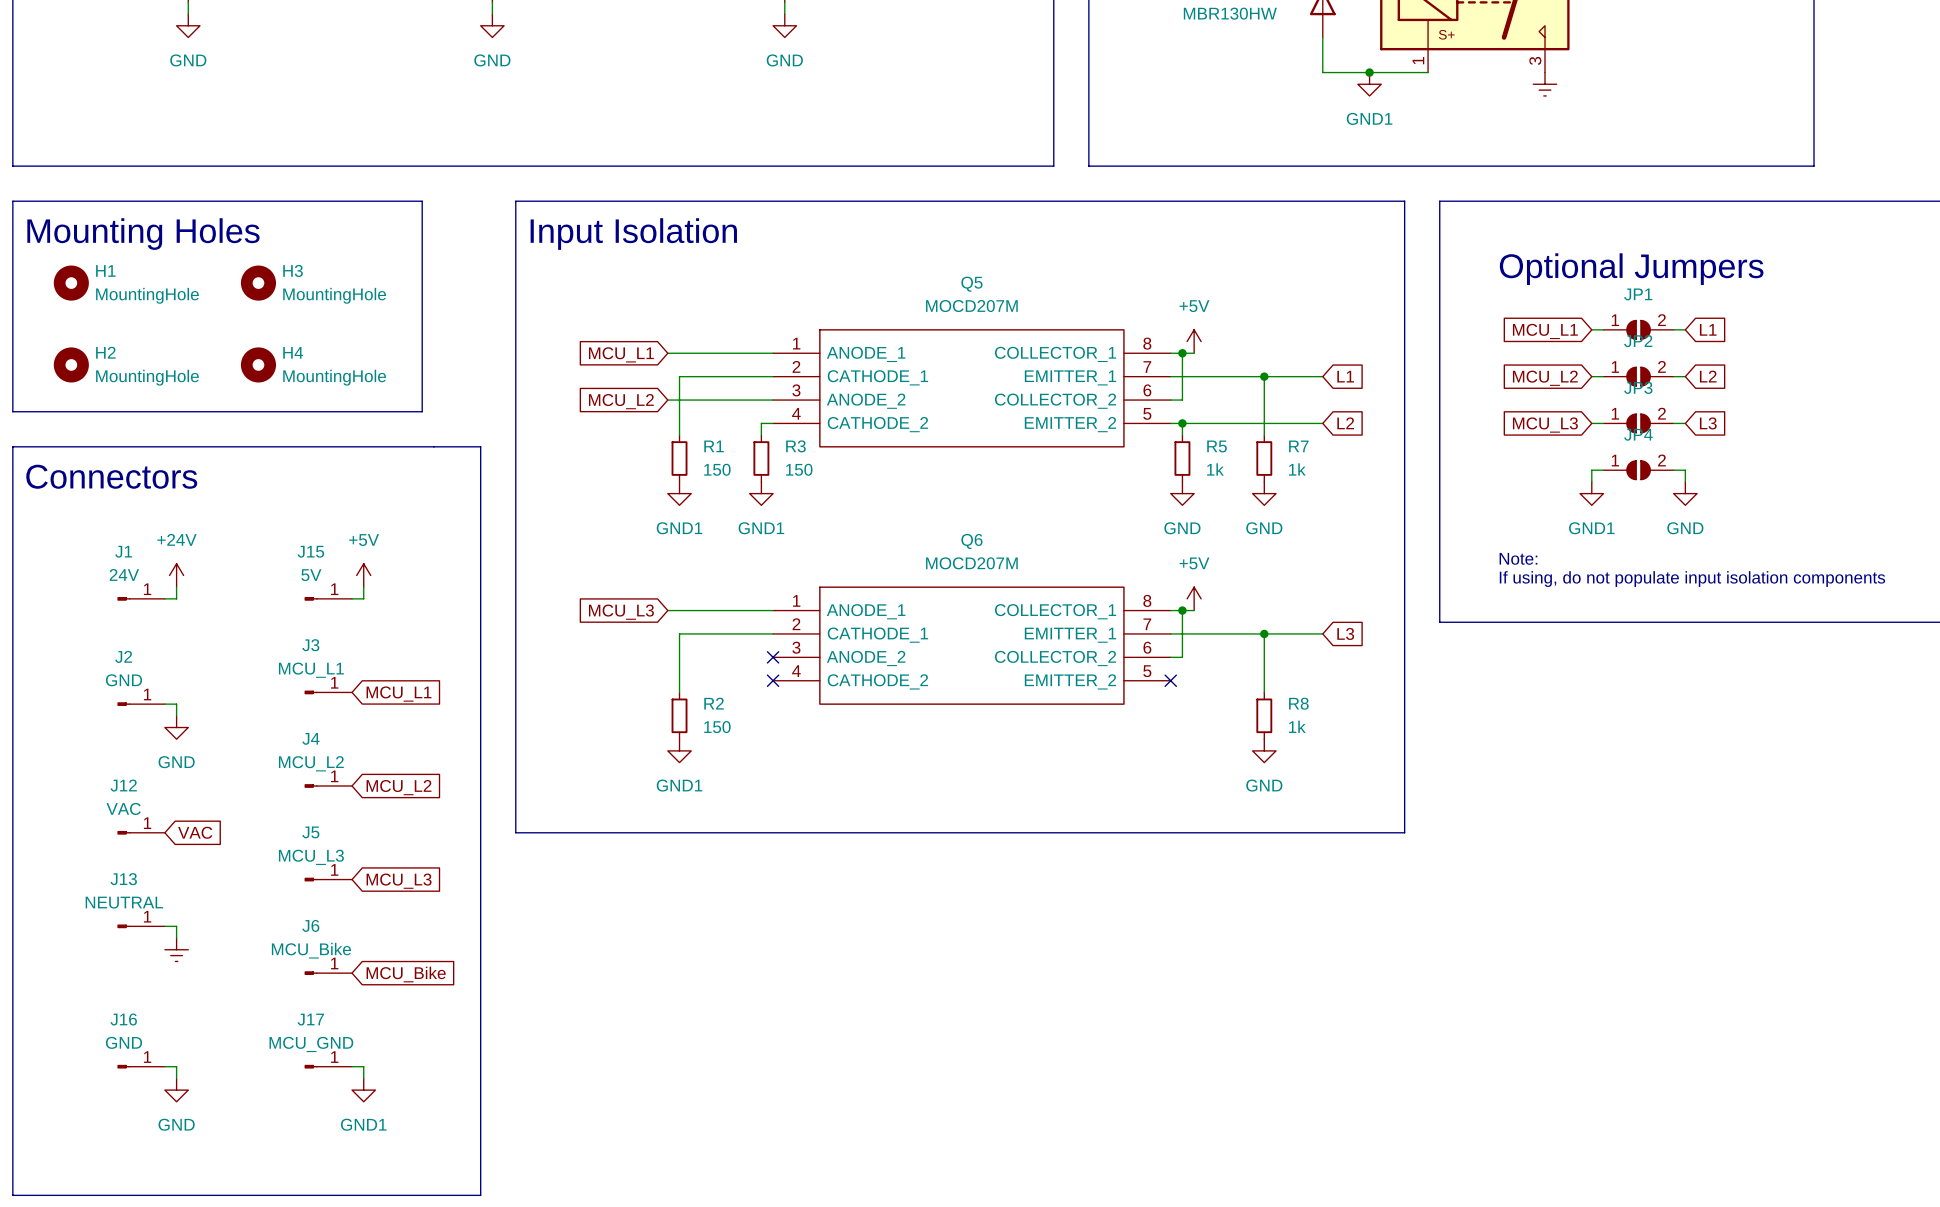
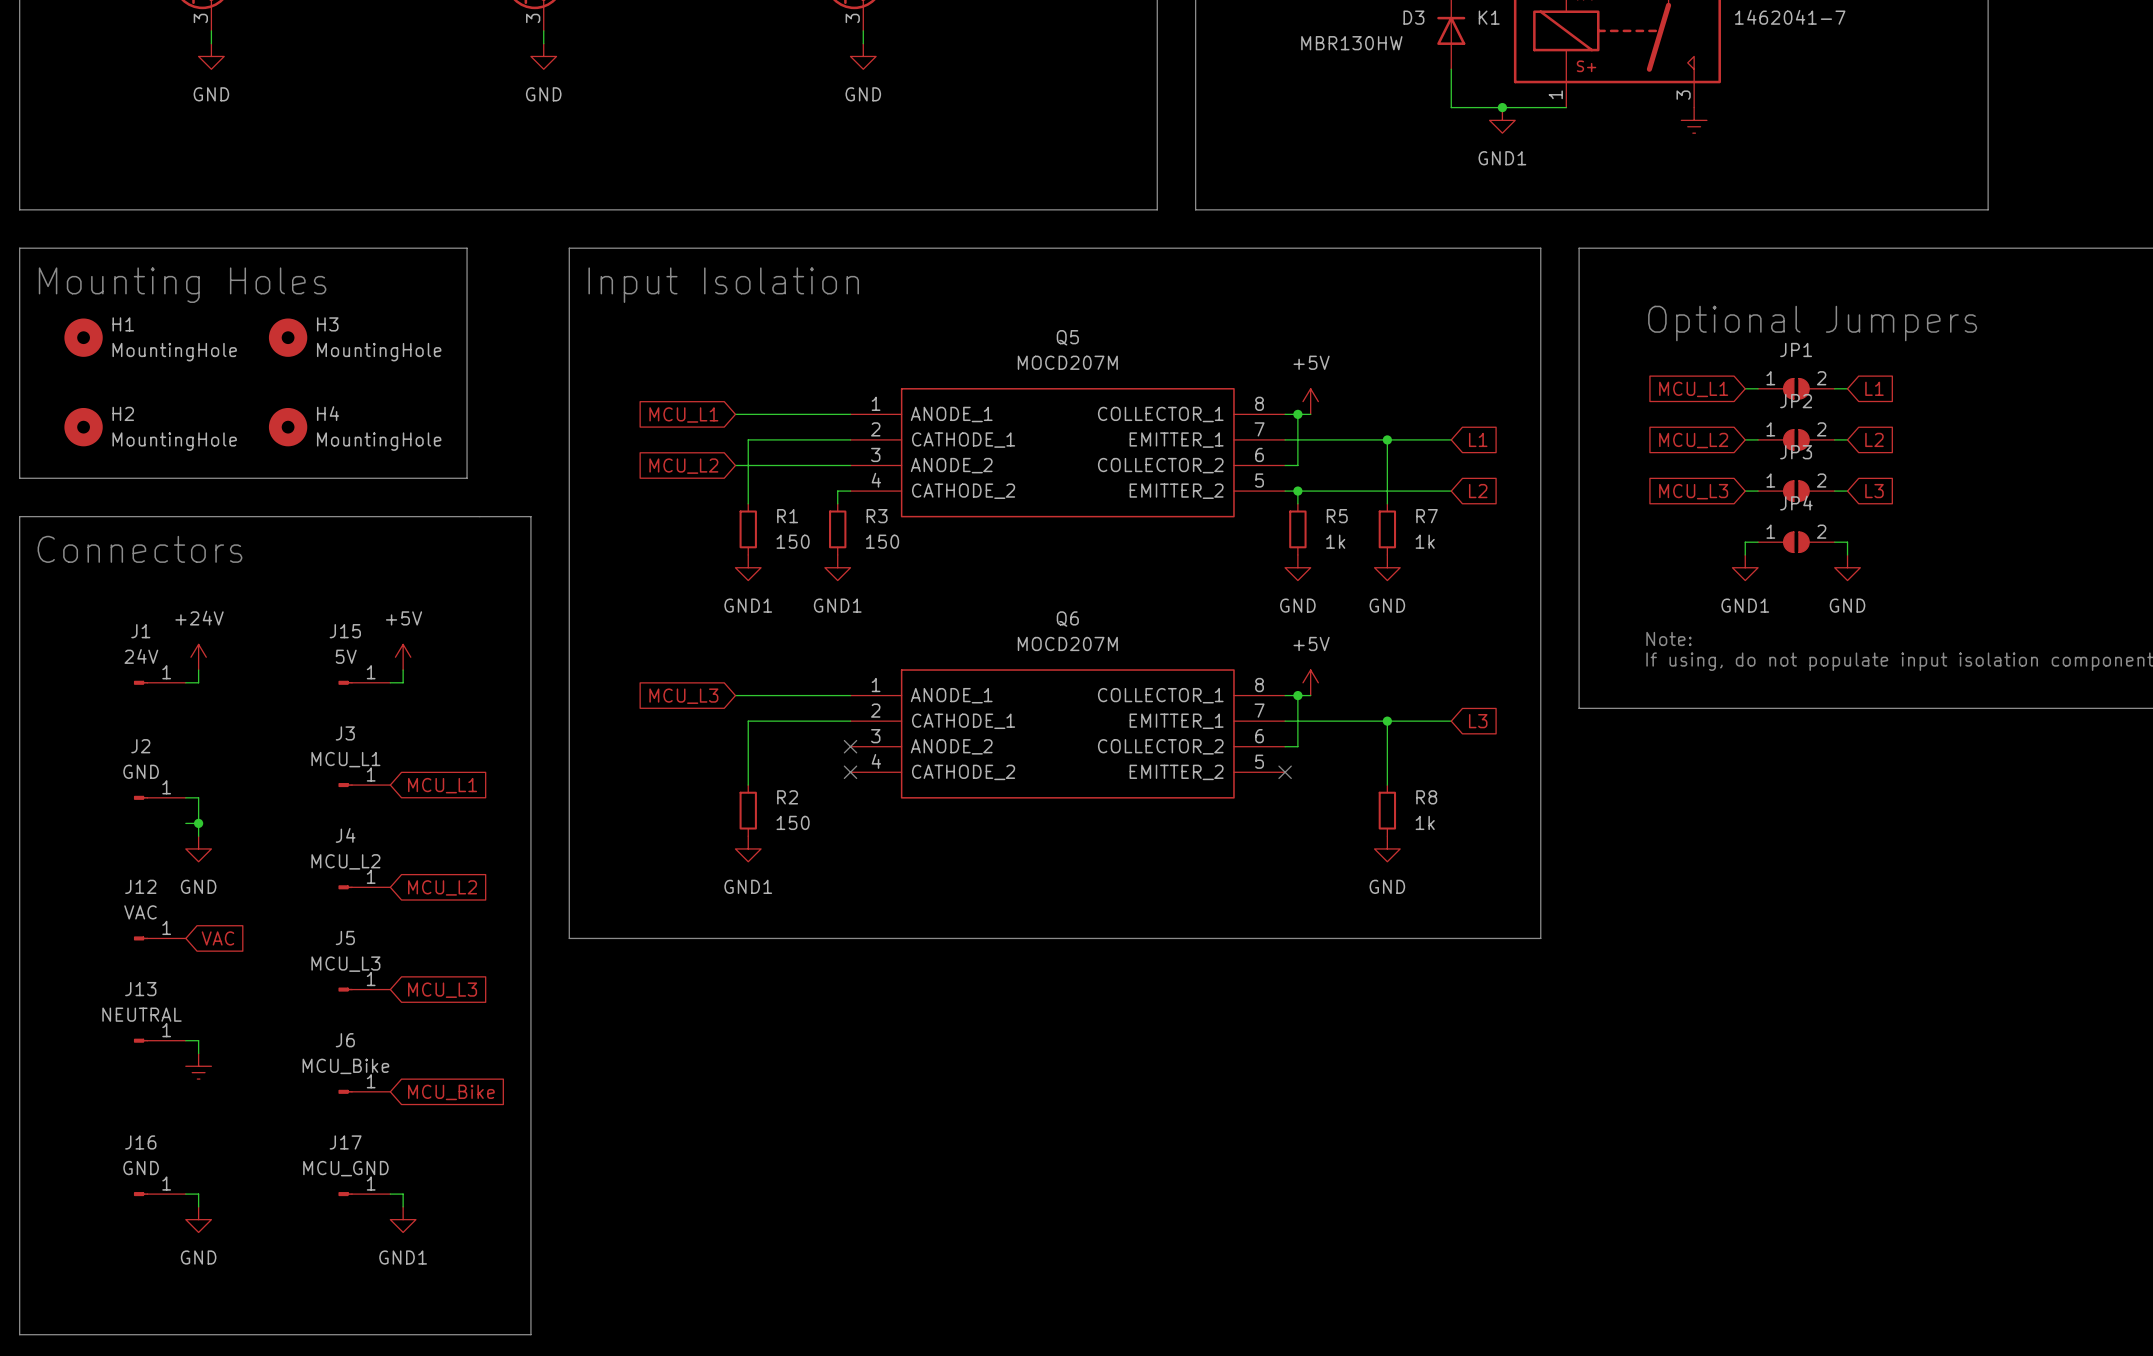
power symbol position: GND (176, 727) -> GND (198, 848)
junction: none -> (198, 823)

